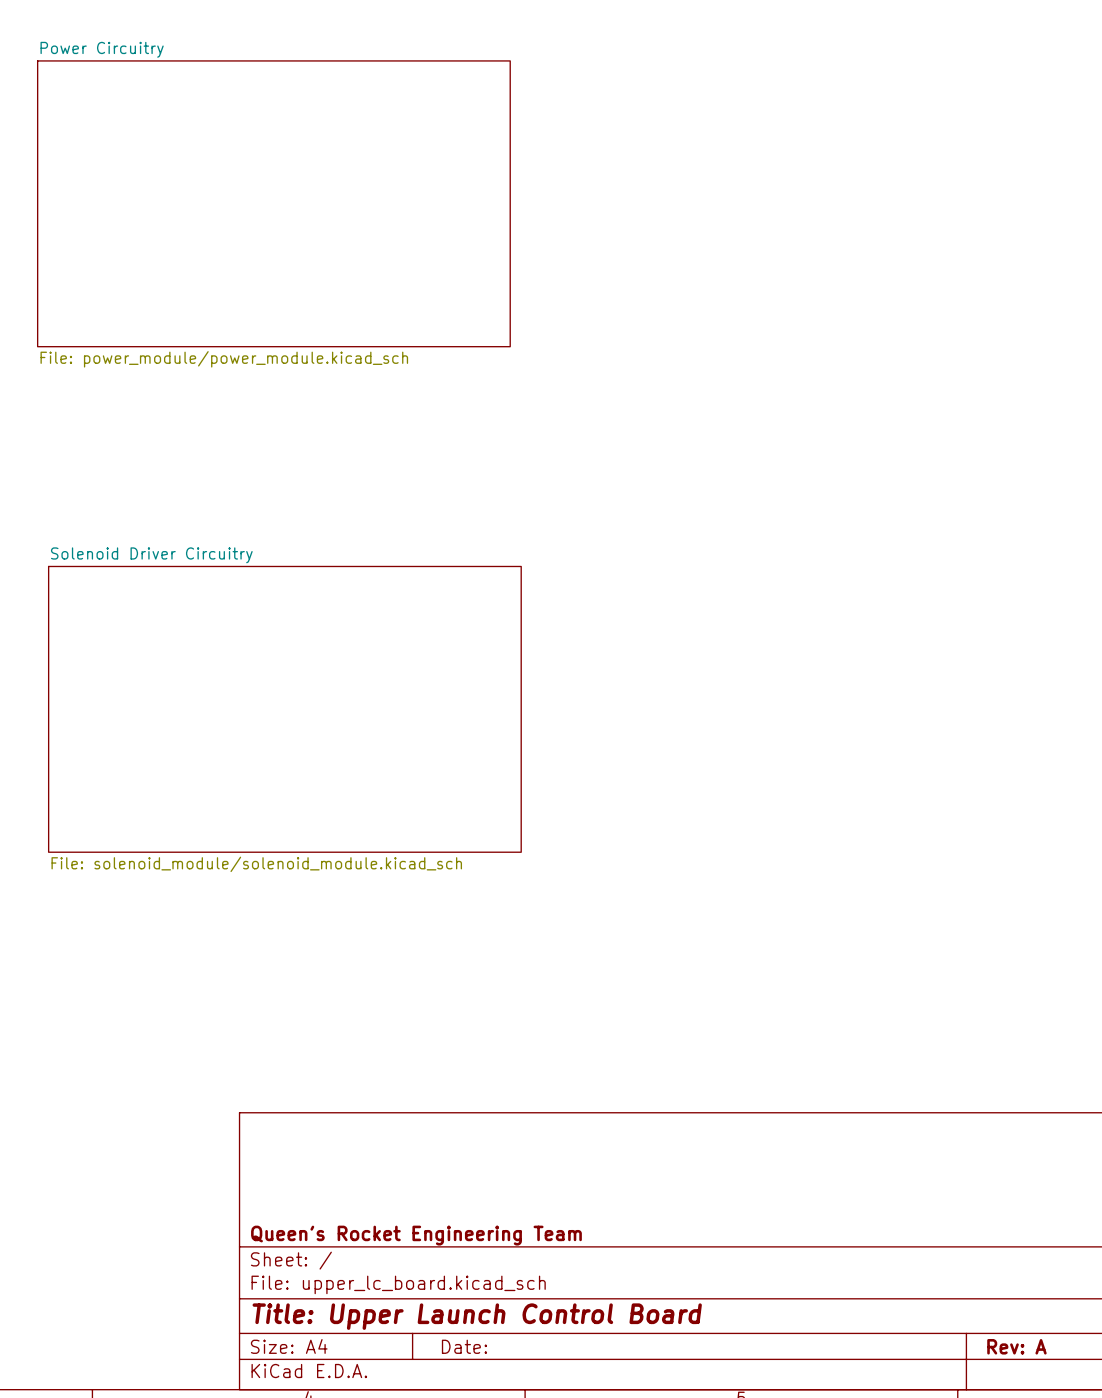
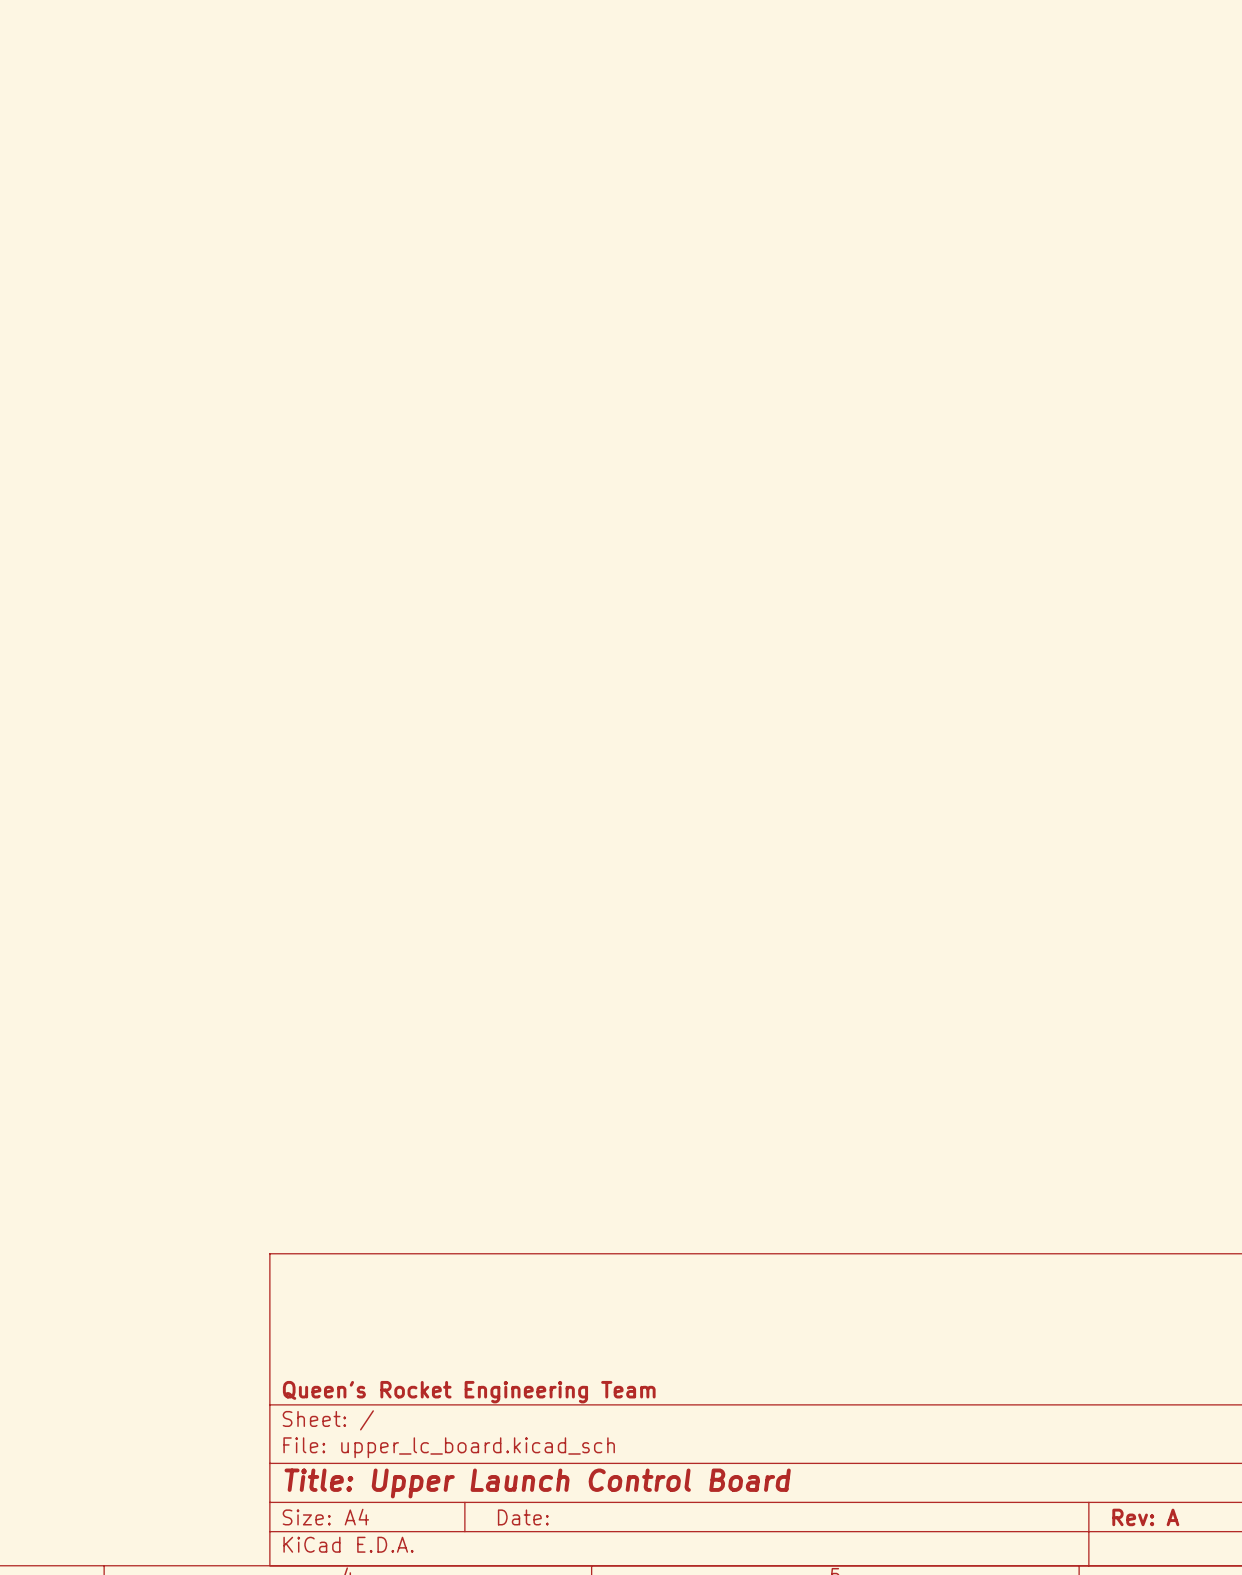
sheet Power Circuitry: File: power_module/power_module.kicad_sch (273, 203) -> none
sheet Solenoid Driver Circuitry: File: solenoid_module/solenoid_module.kicad_sch (284, 709) -> none

